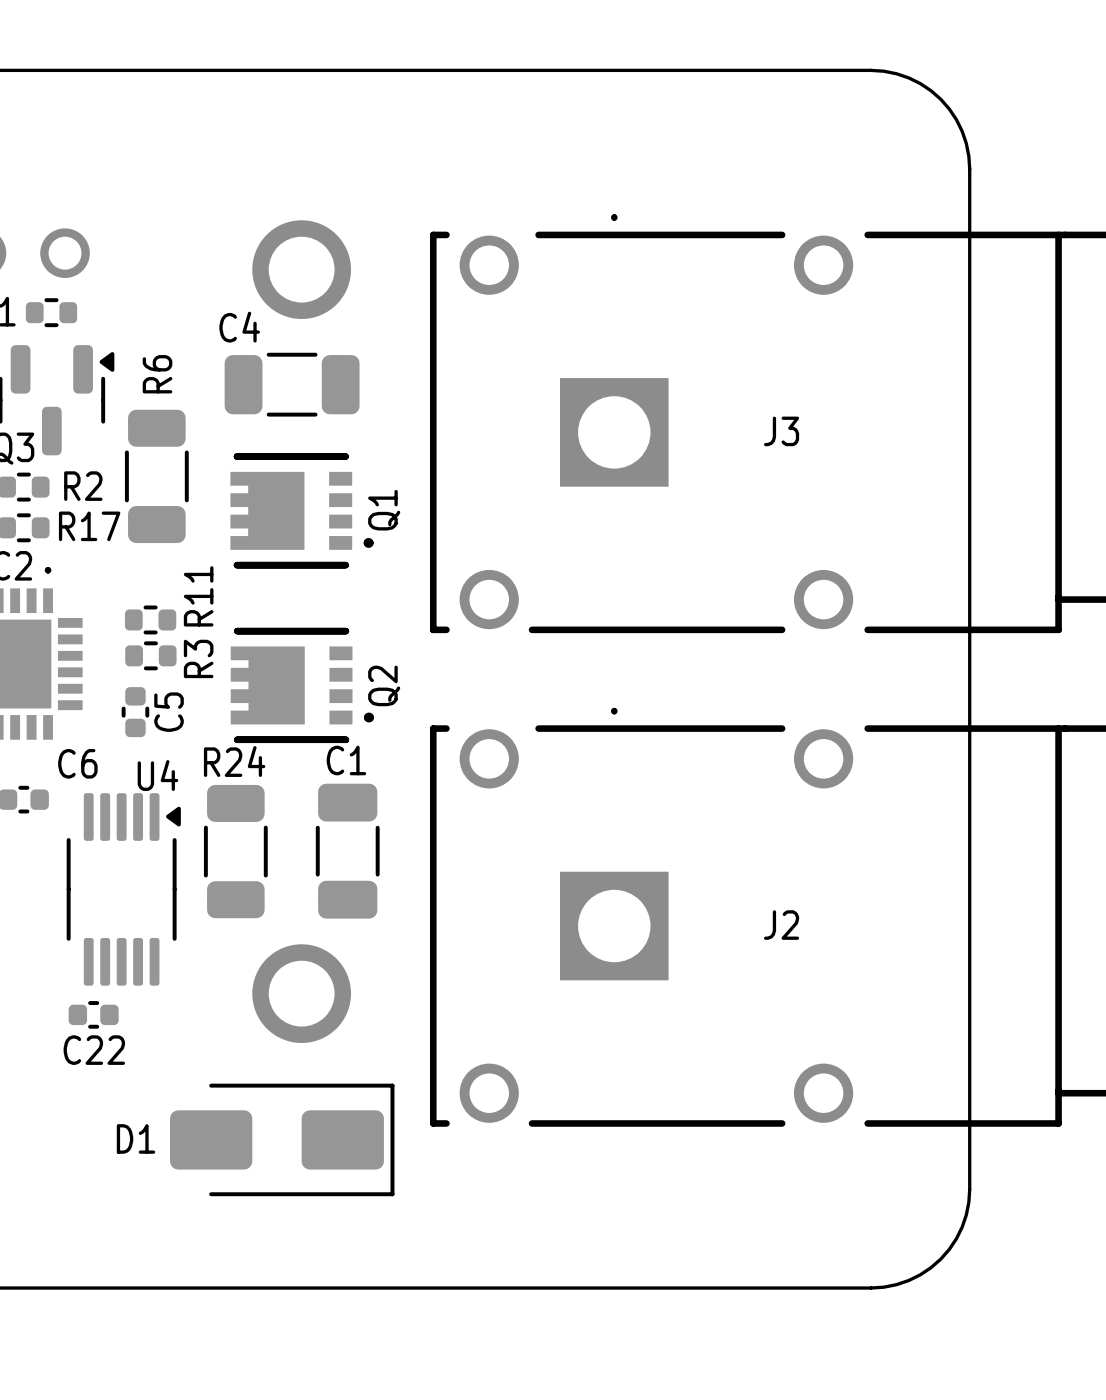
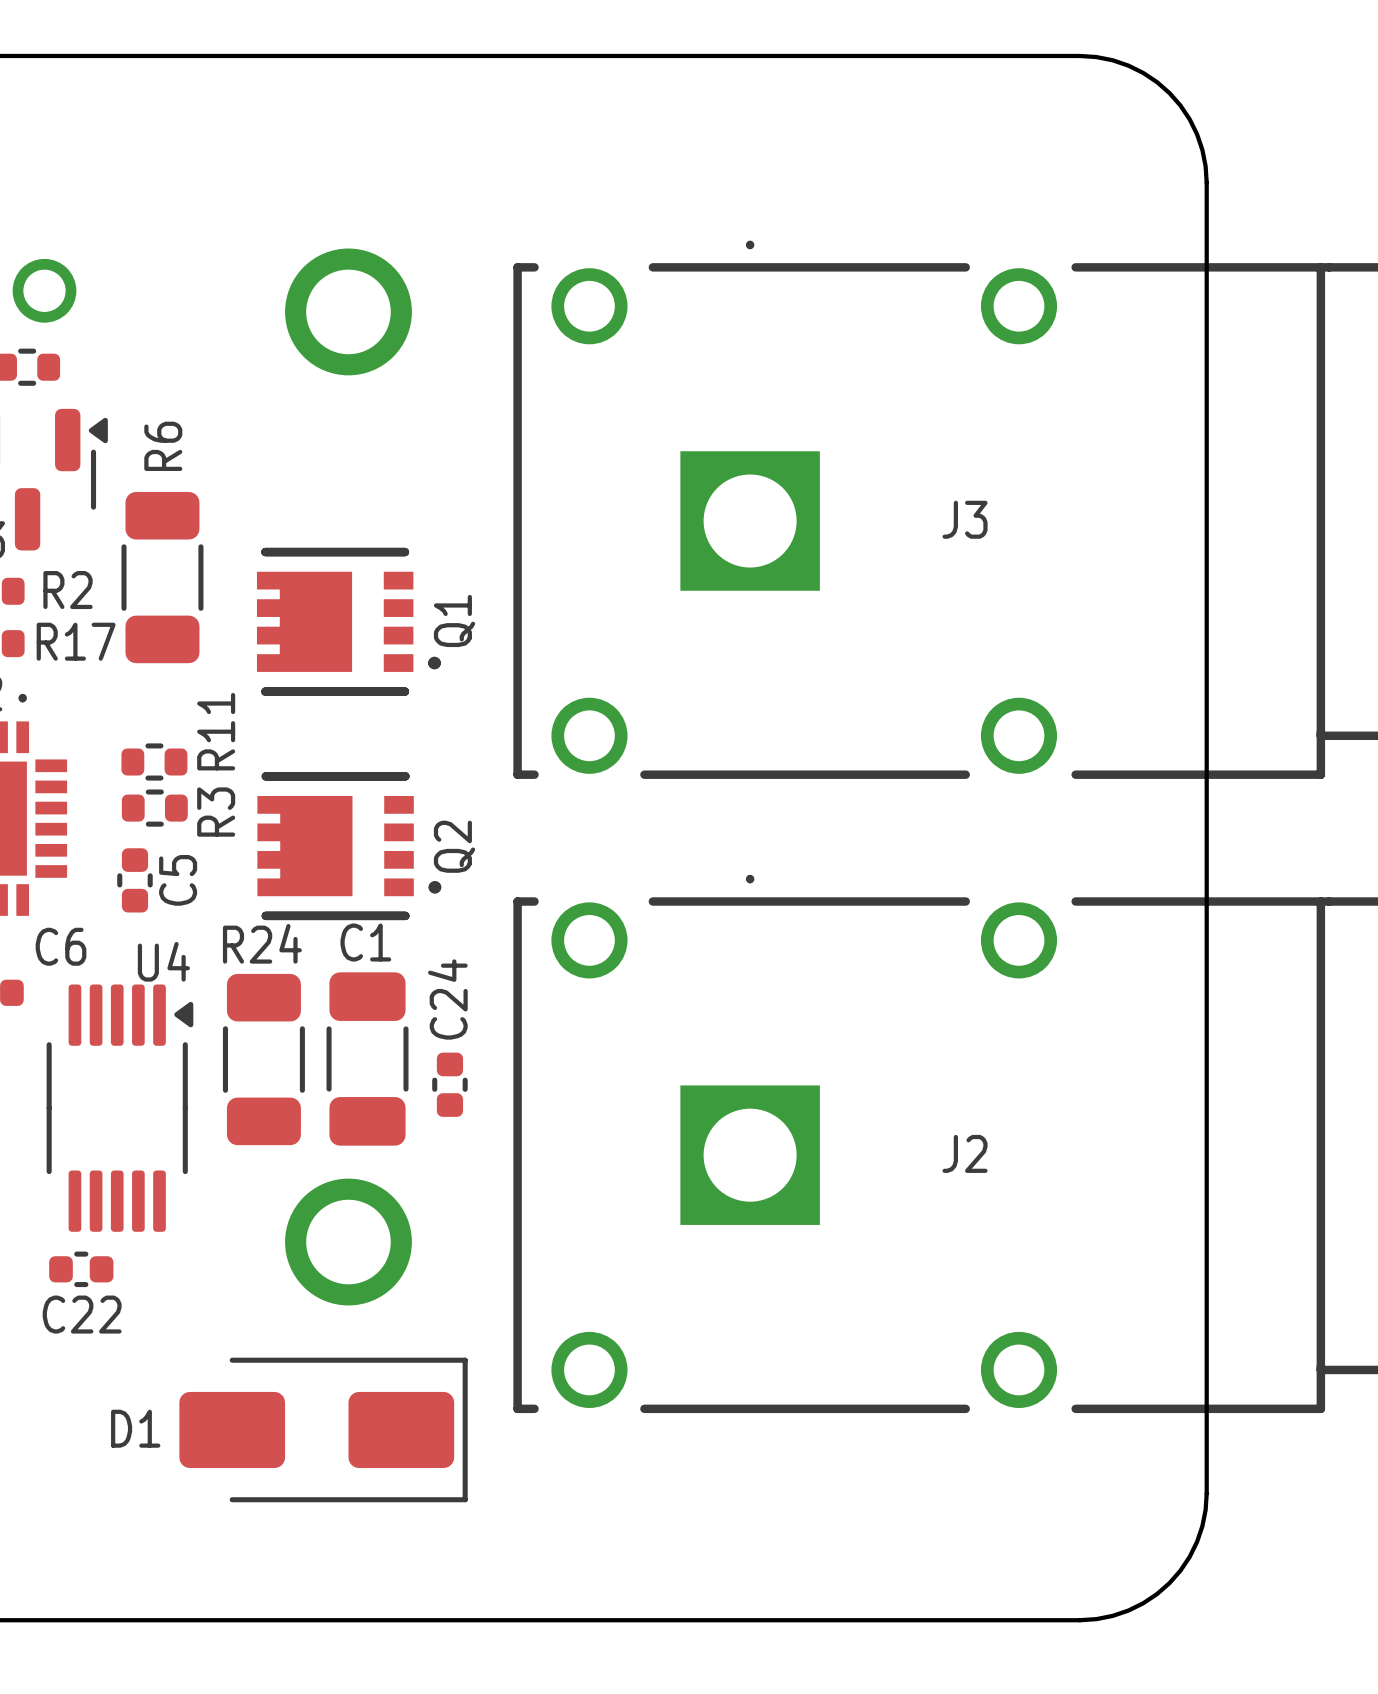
C4: (292, 384) -> none
C1 position: (347, 851) -> (367, 1058)
C24: none -> (449, 1084)

